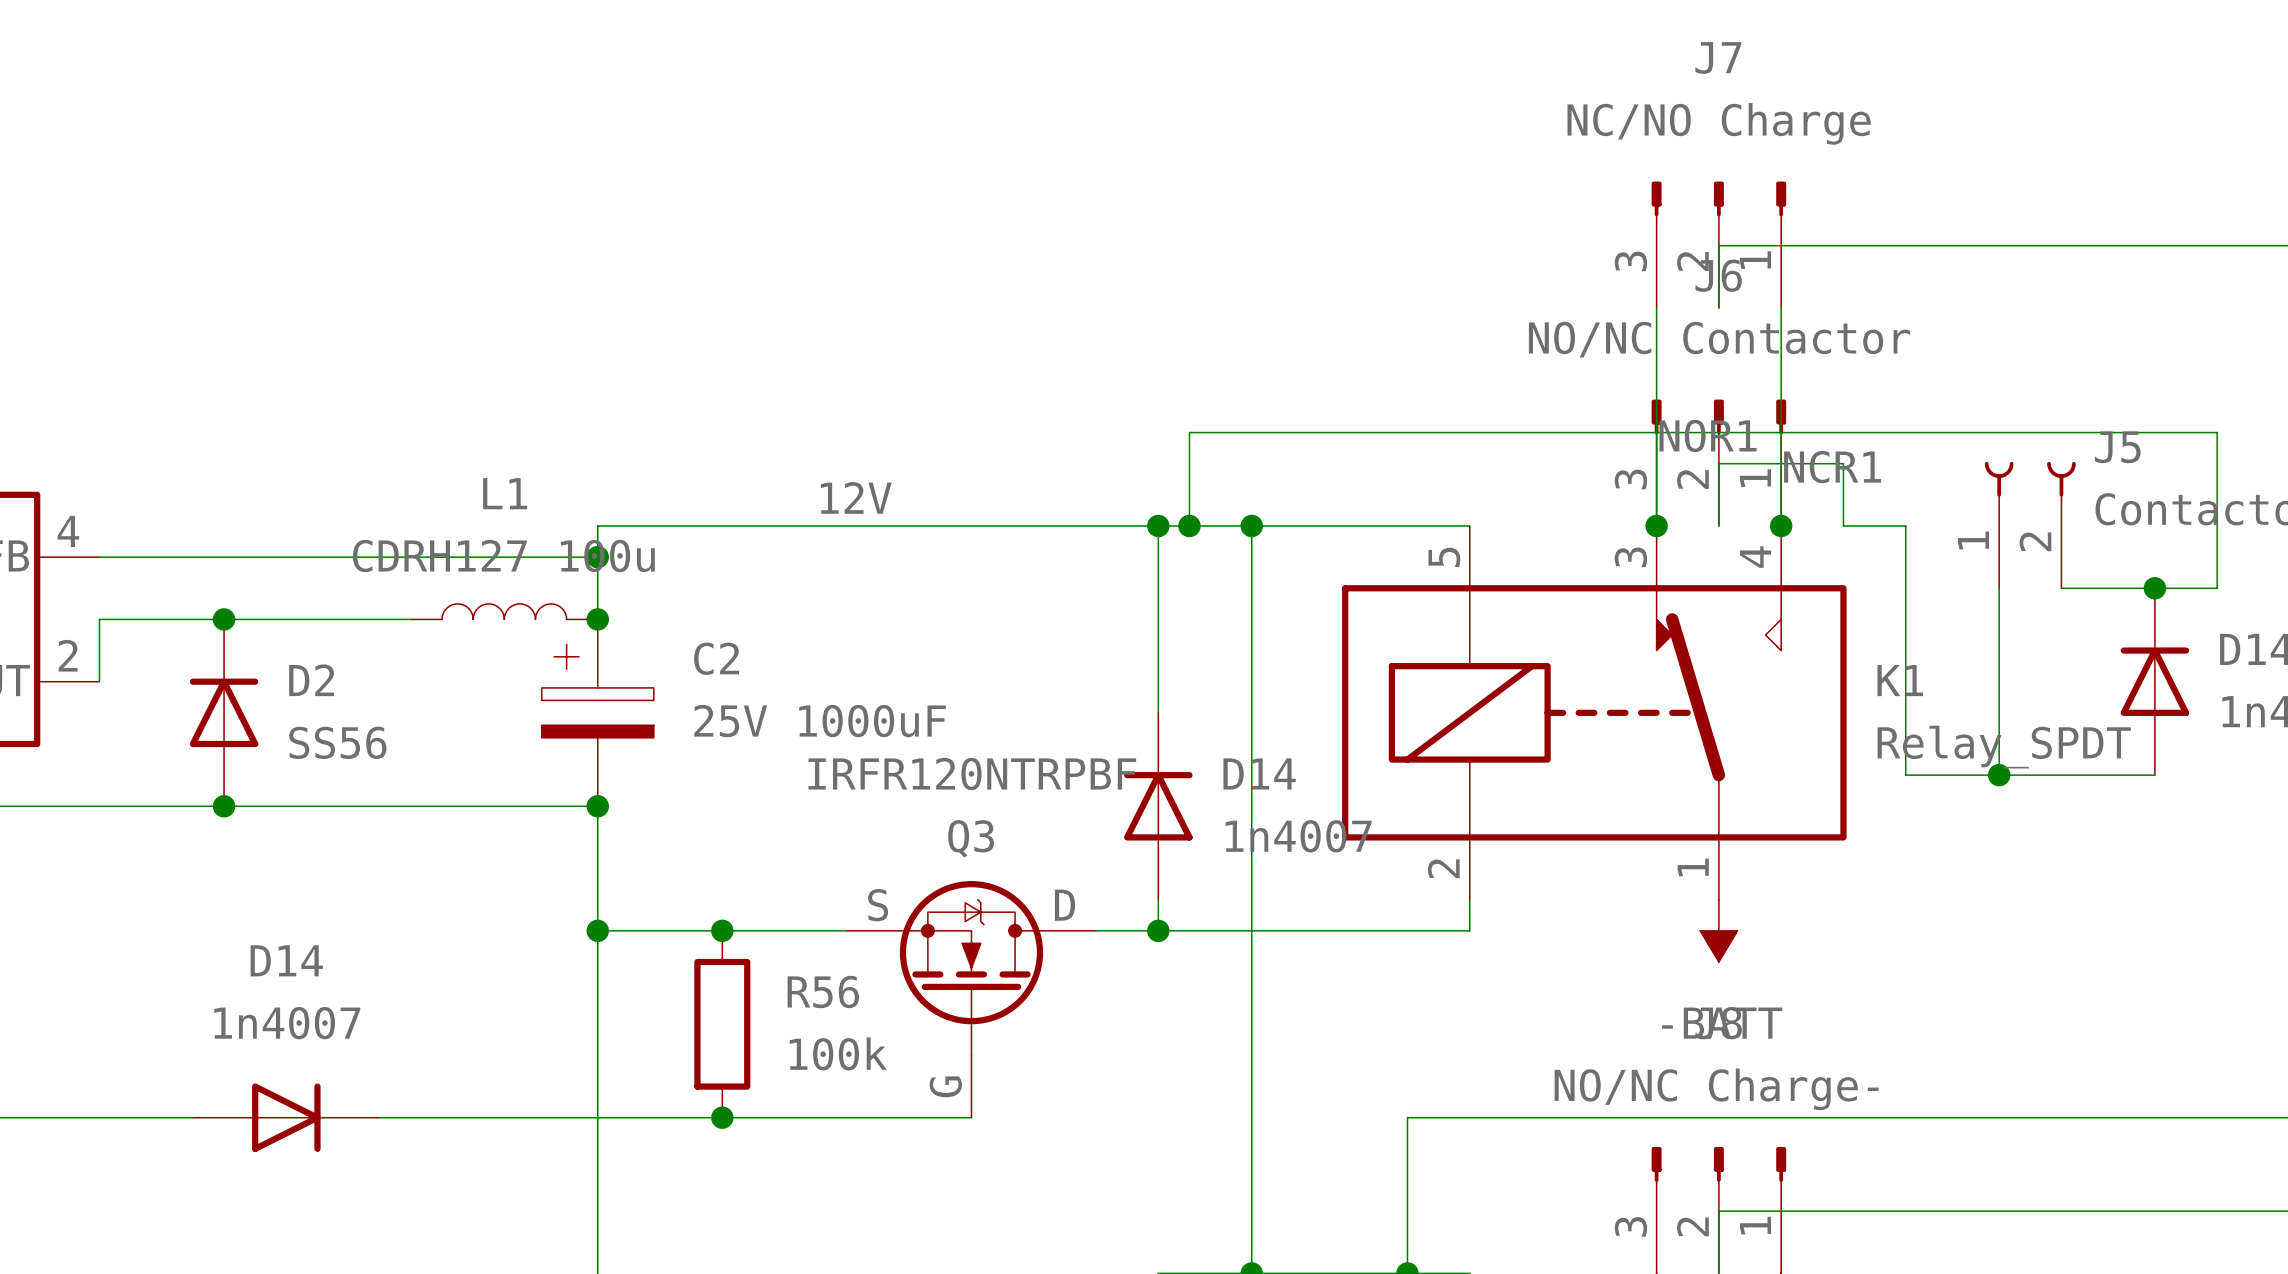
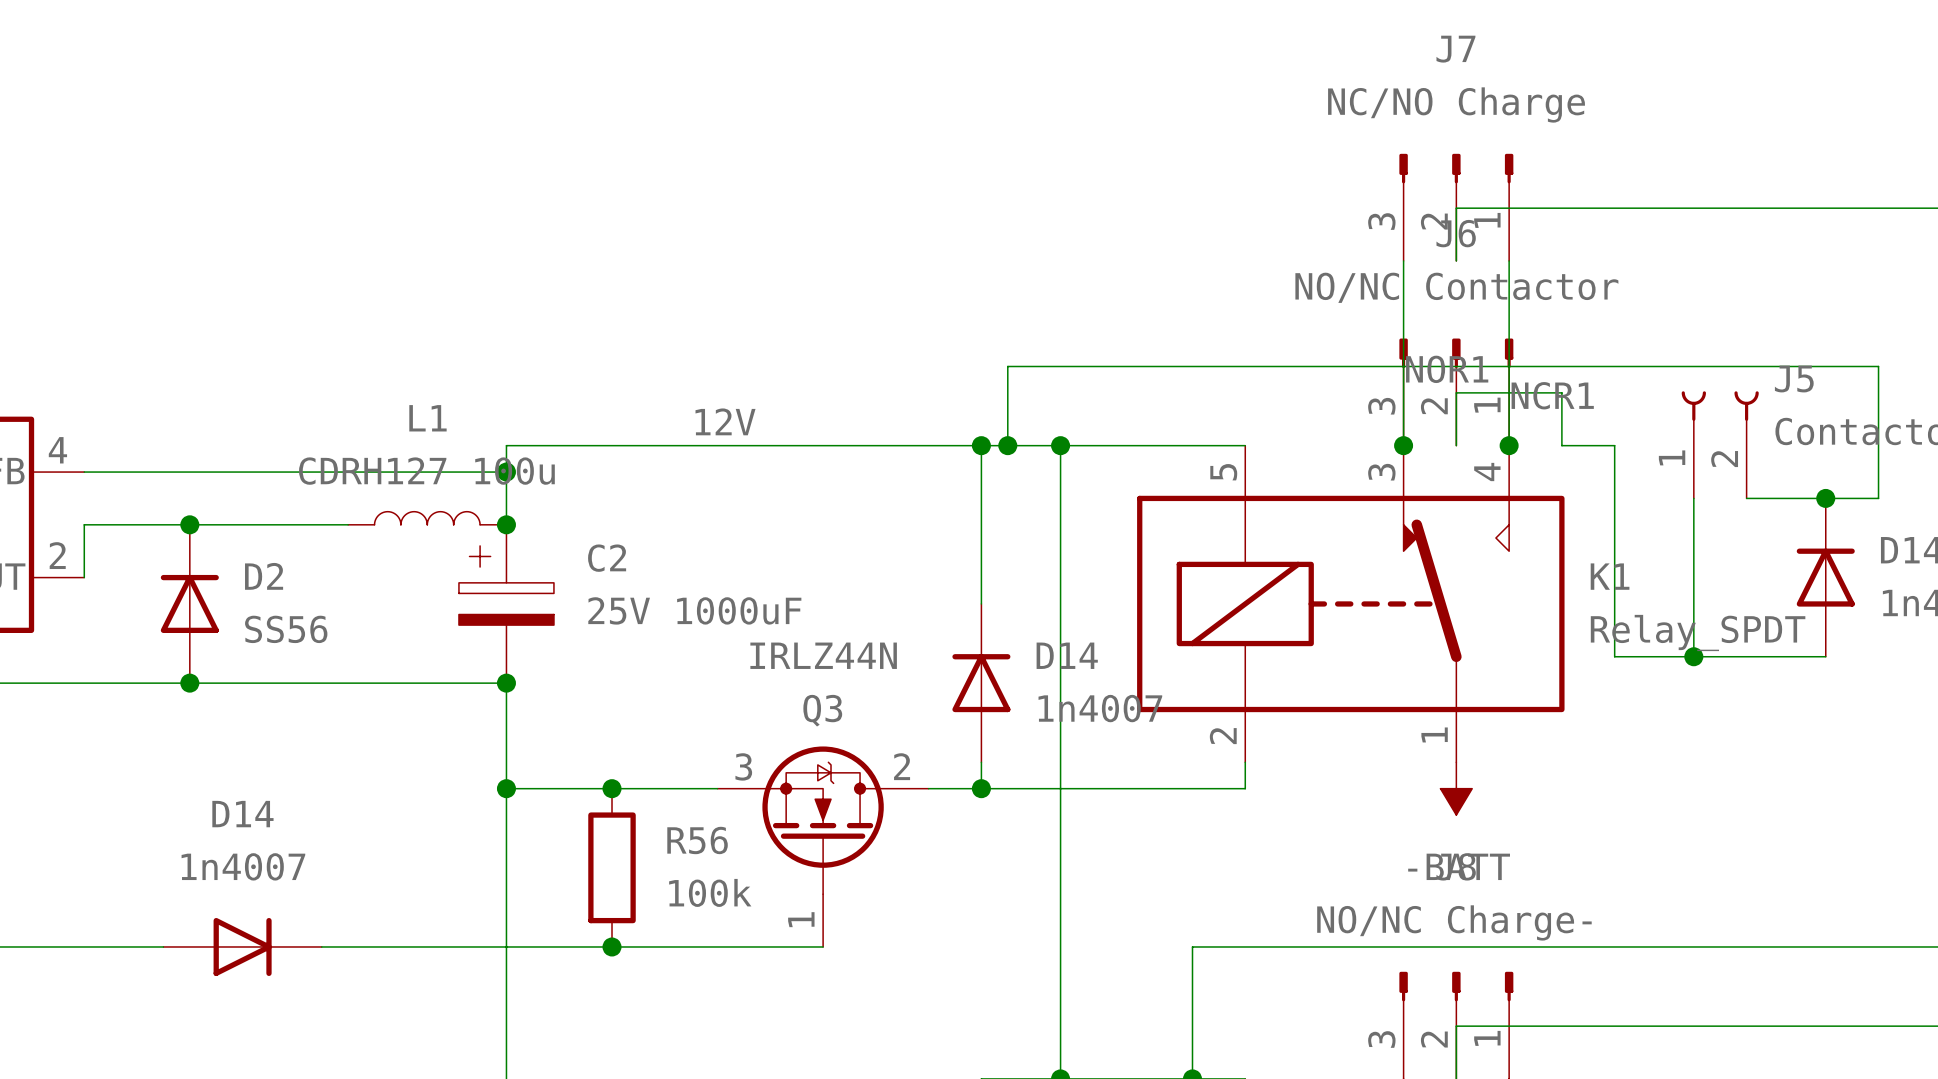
Q3 value: IRFR120NTRPBF (972, 773) -> IRLZ44N (823, 655)
Q3 pin number: none -> 2 (902, 766)
Q3 pin number: none -> 3 (743, 766)
Q3 pin name: S (878, 905) -> none
Q3 pin name: D (1065, 905) -> none
Q3 pin number: none -> 1 (801, 919)
Q3 pin name: G (945, 1086) -> none

